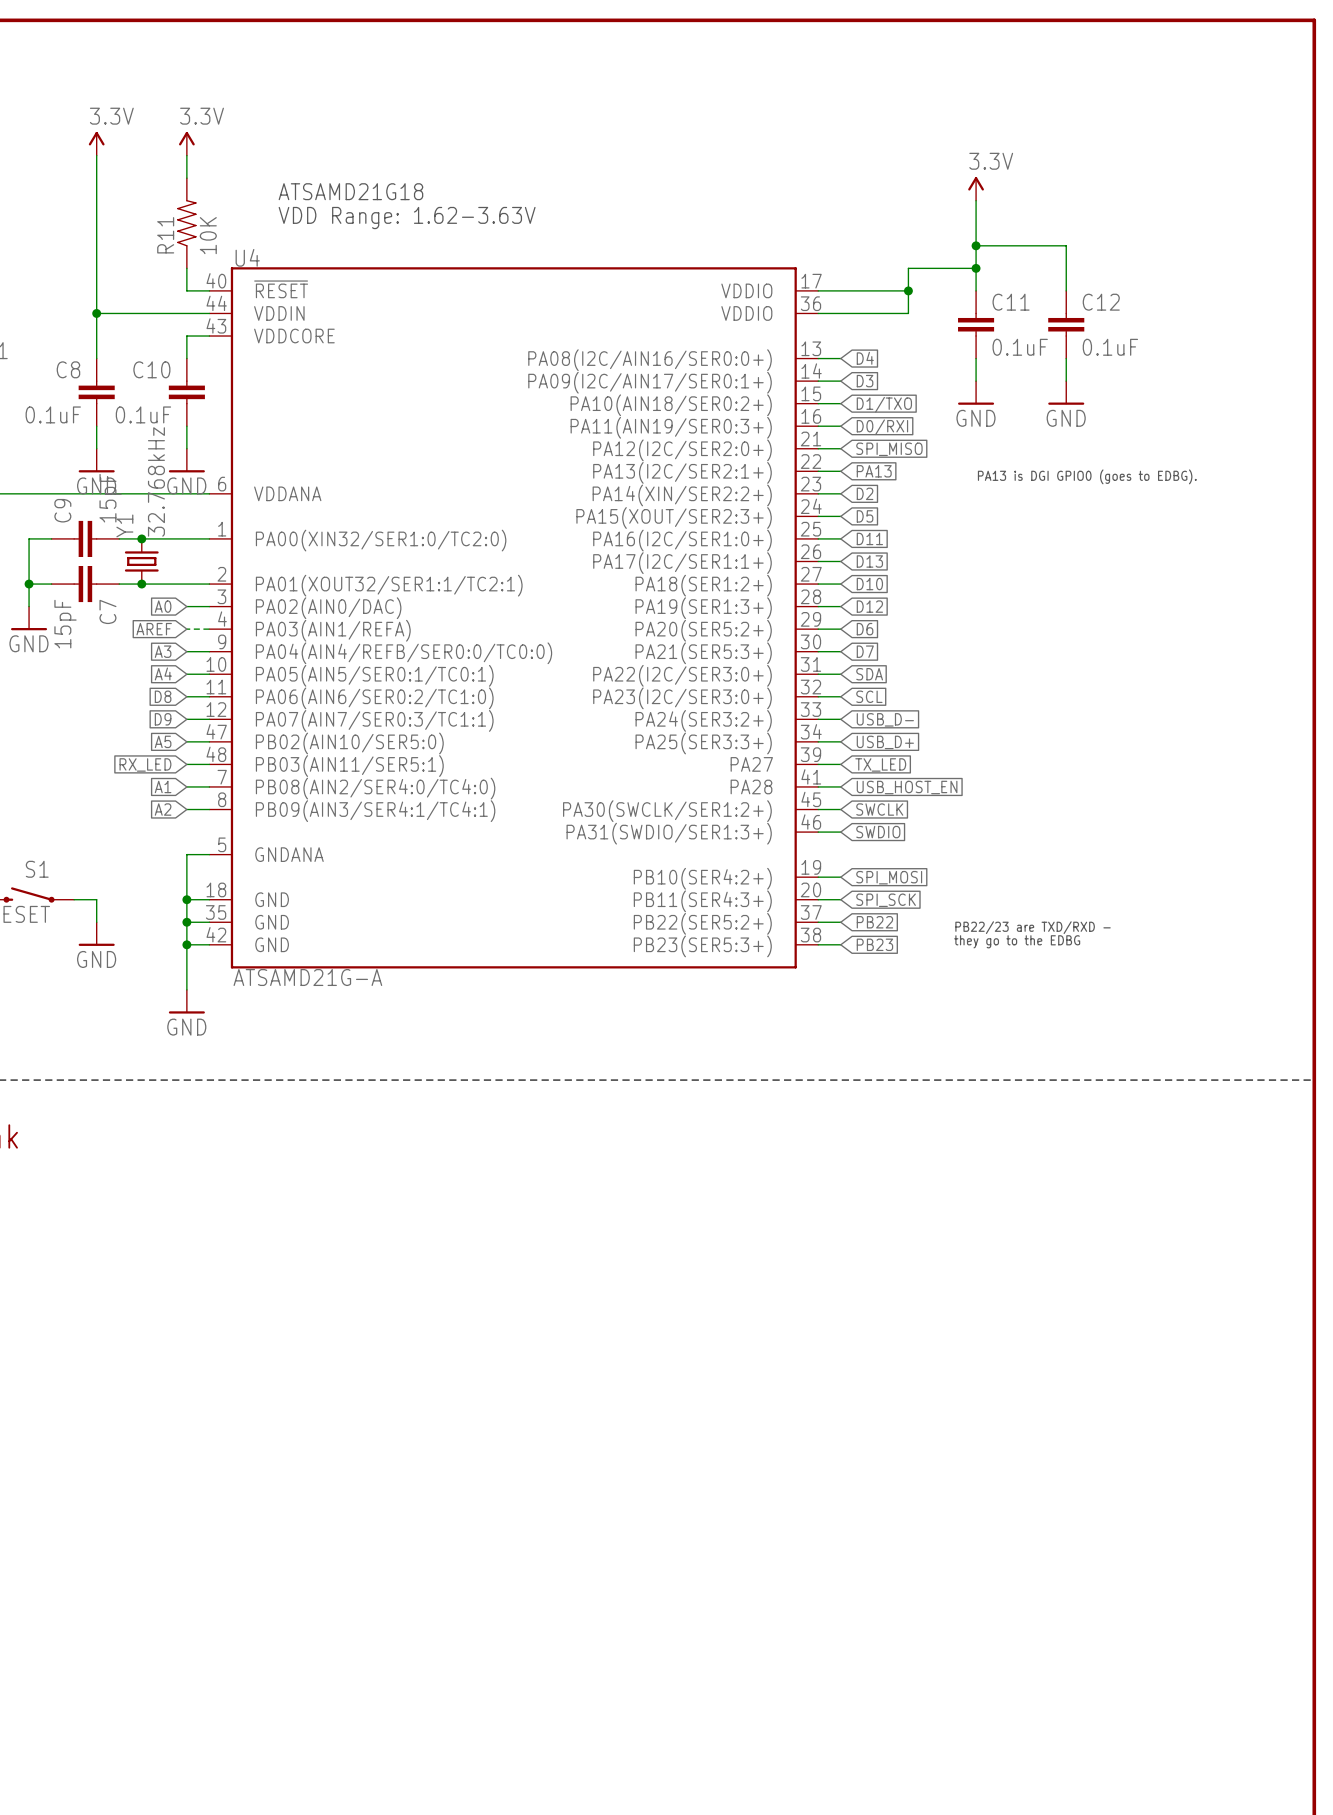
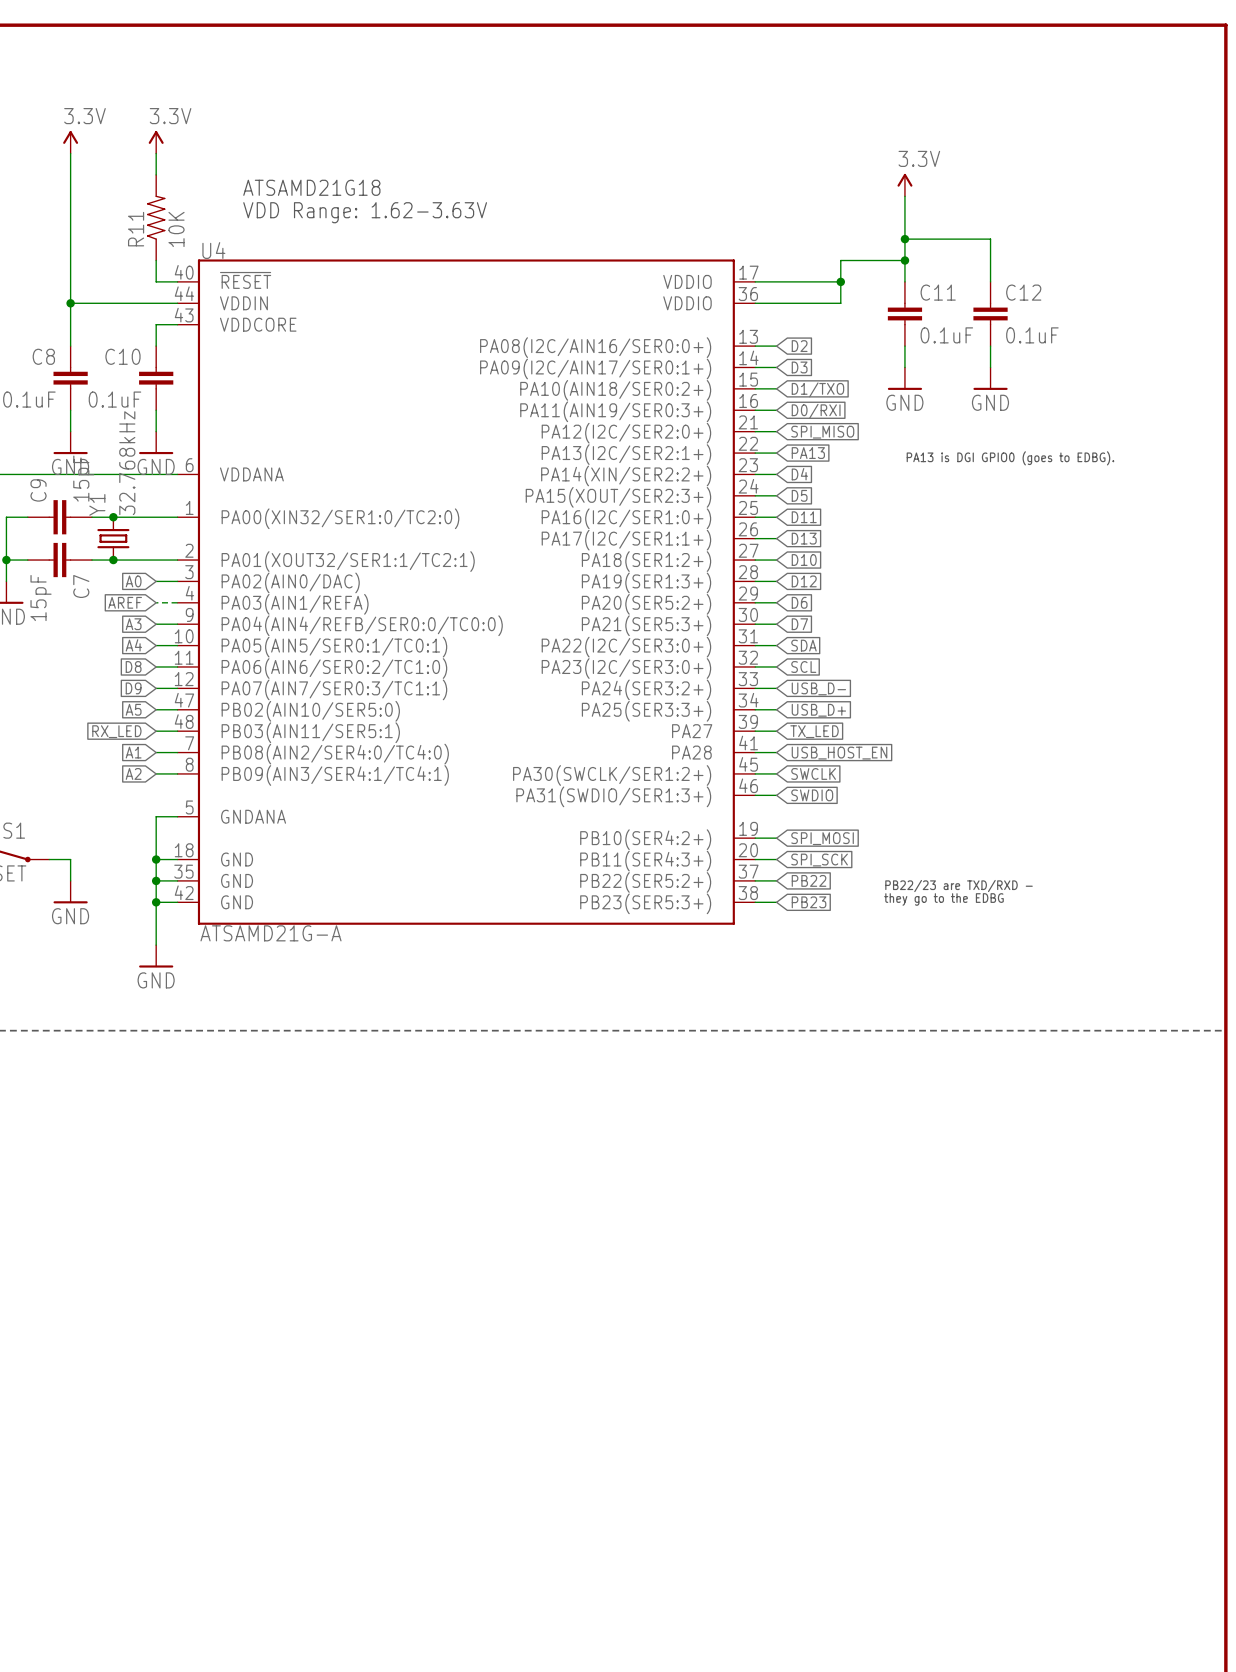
global label: D4 (865, 358) -> D2 (799, 346)
global label: D2 (865, 493) -> D4 (799, 474)

